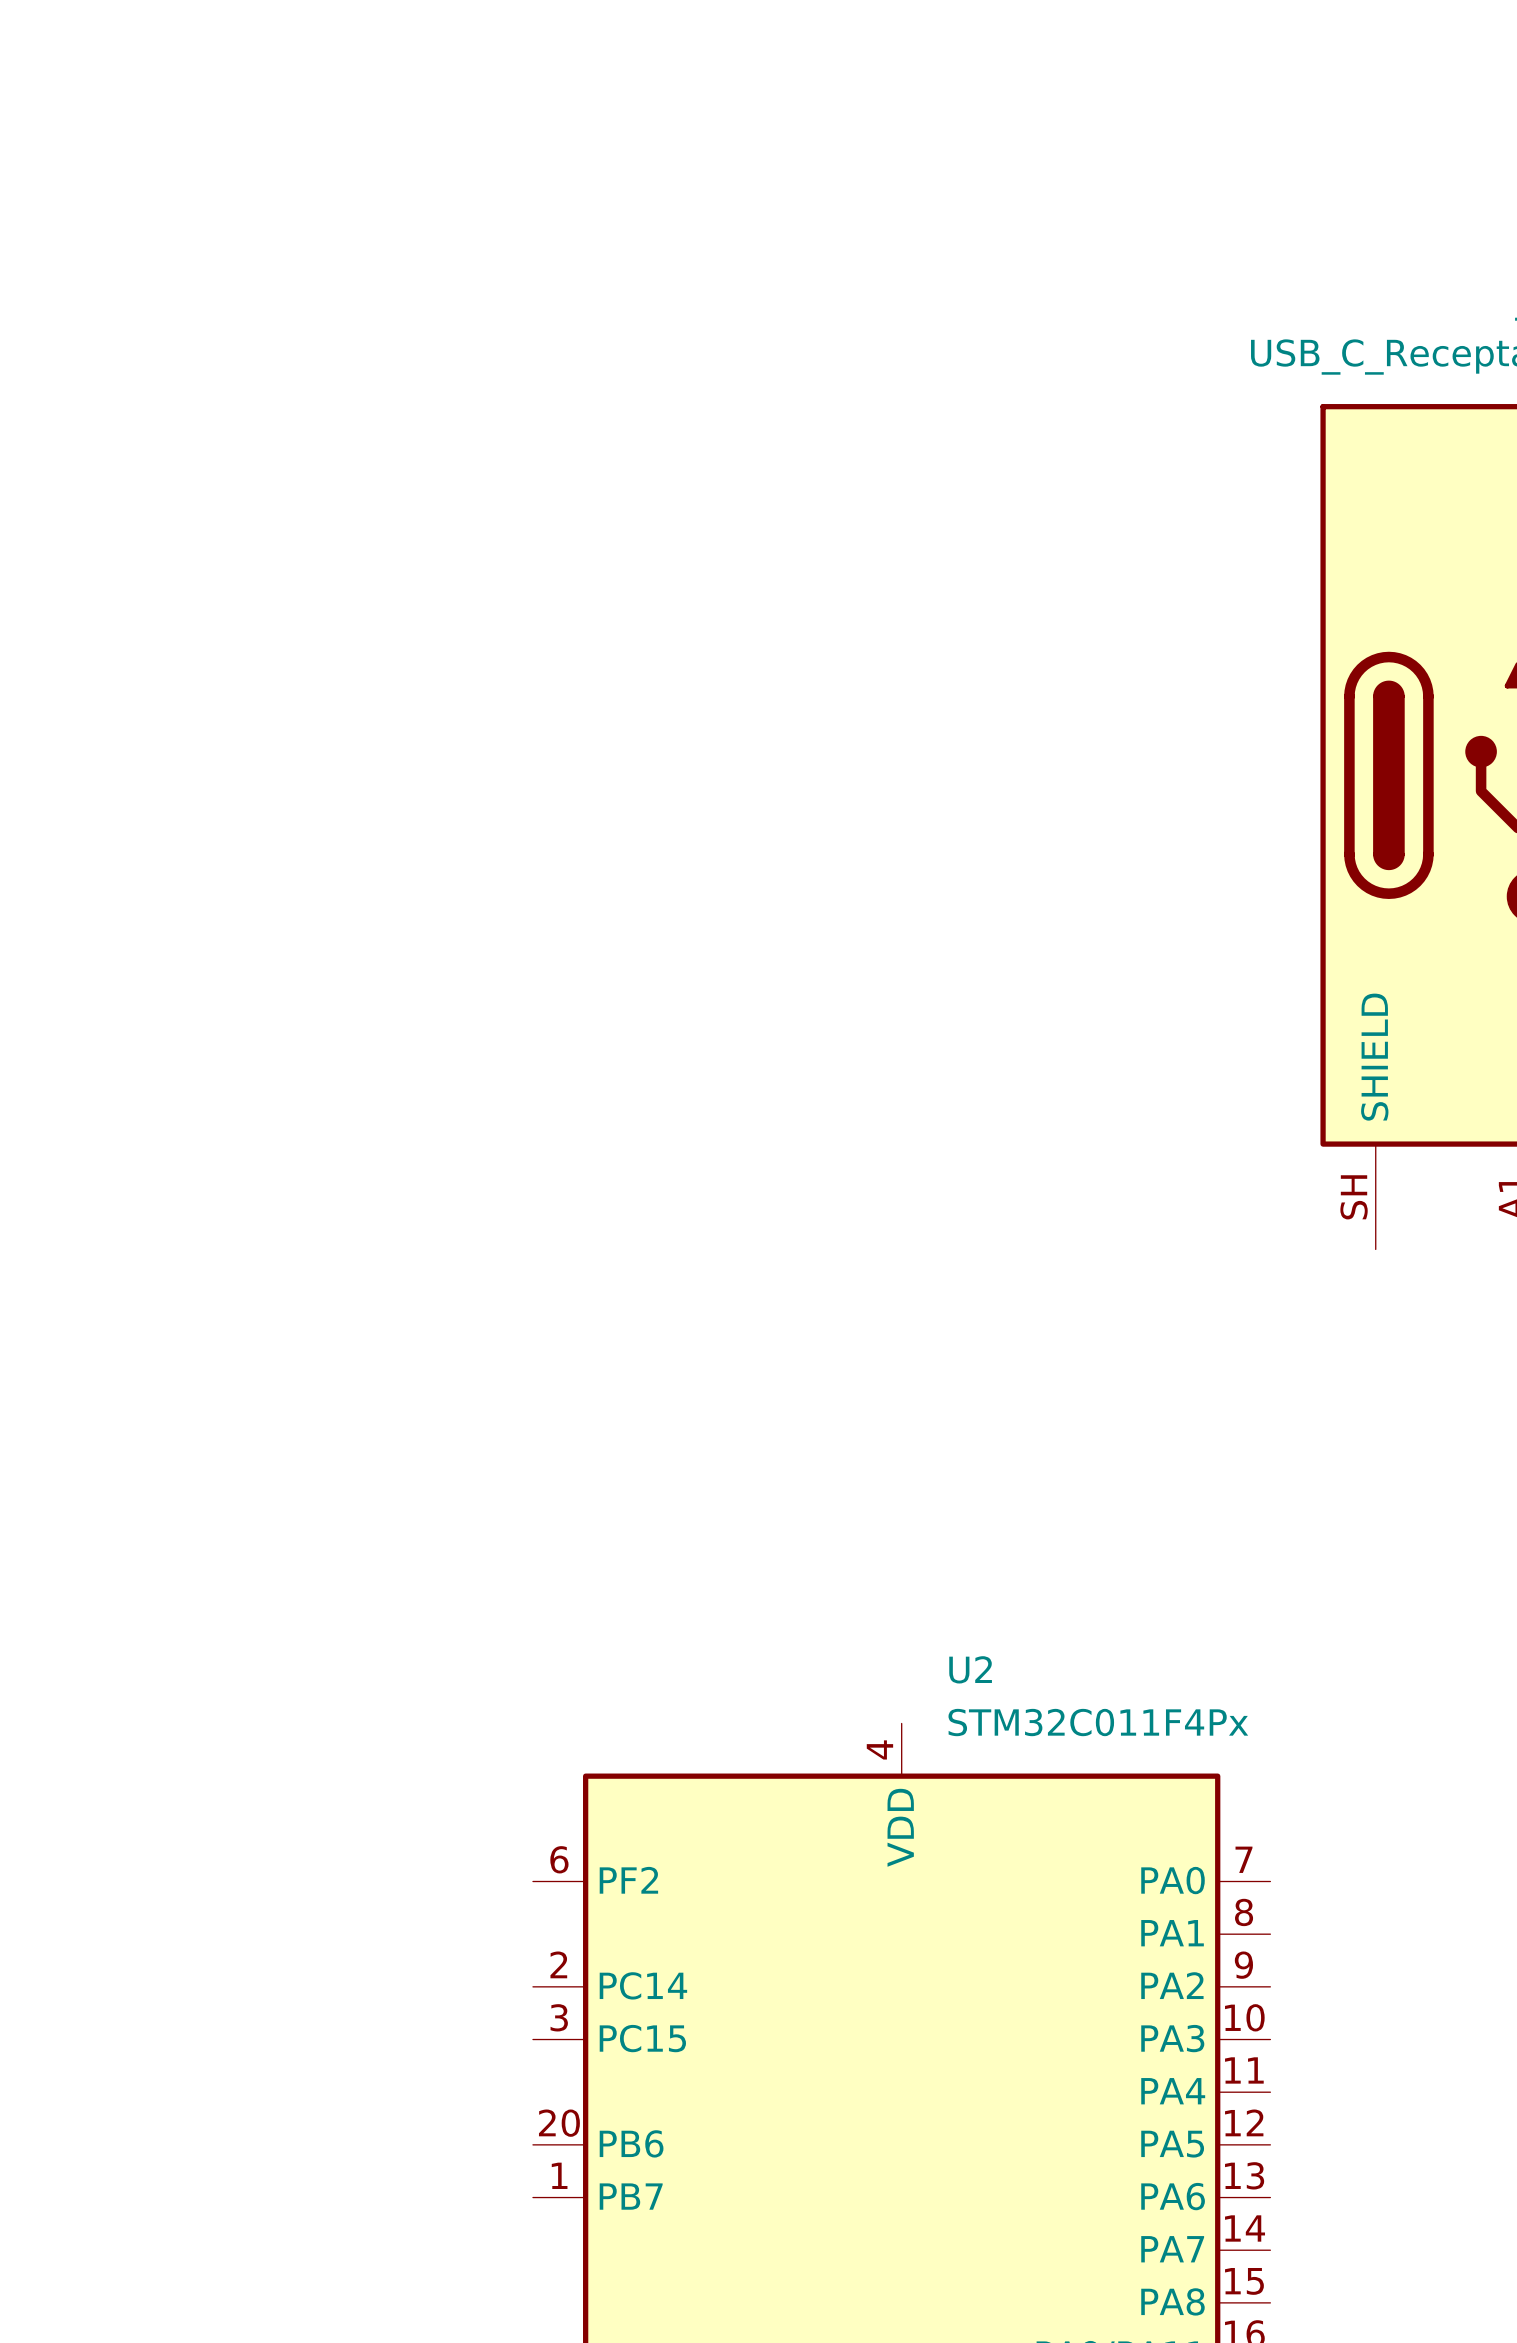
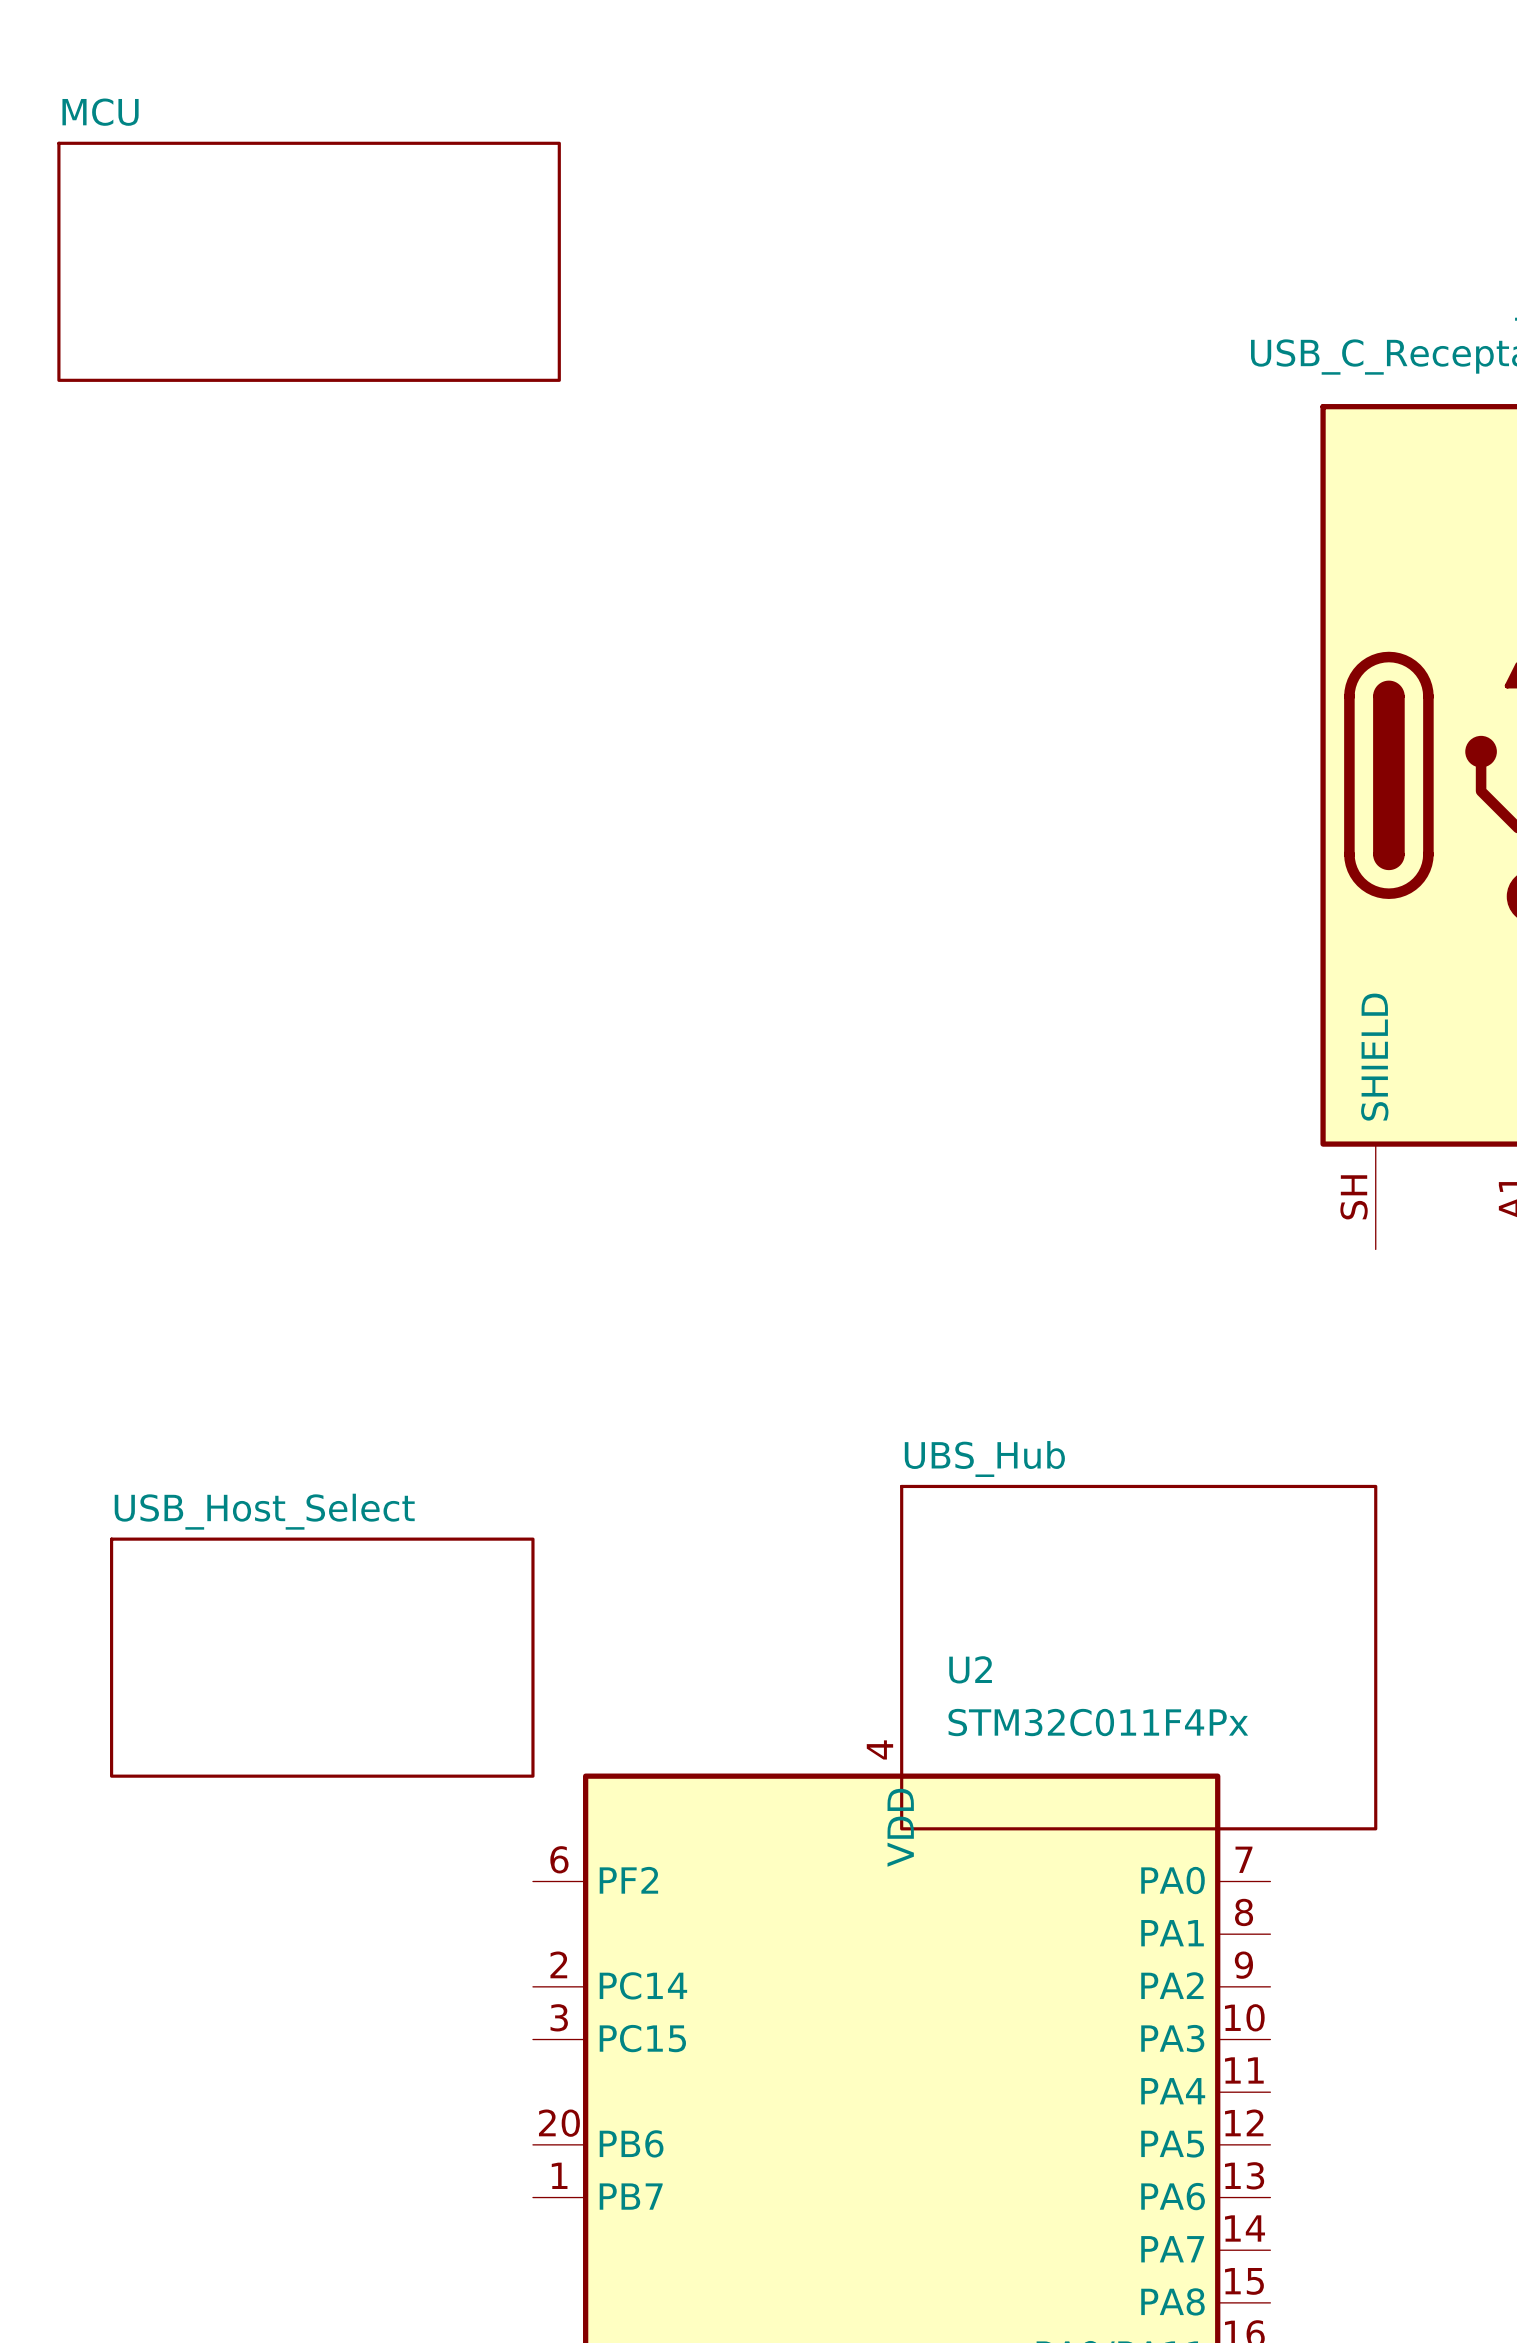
sheet MCU: none -> (309, 261)
sheet USB_Host_Select: none -> (322, 1657)
sheet UBS_Hub: none -> (1138, 1657)

